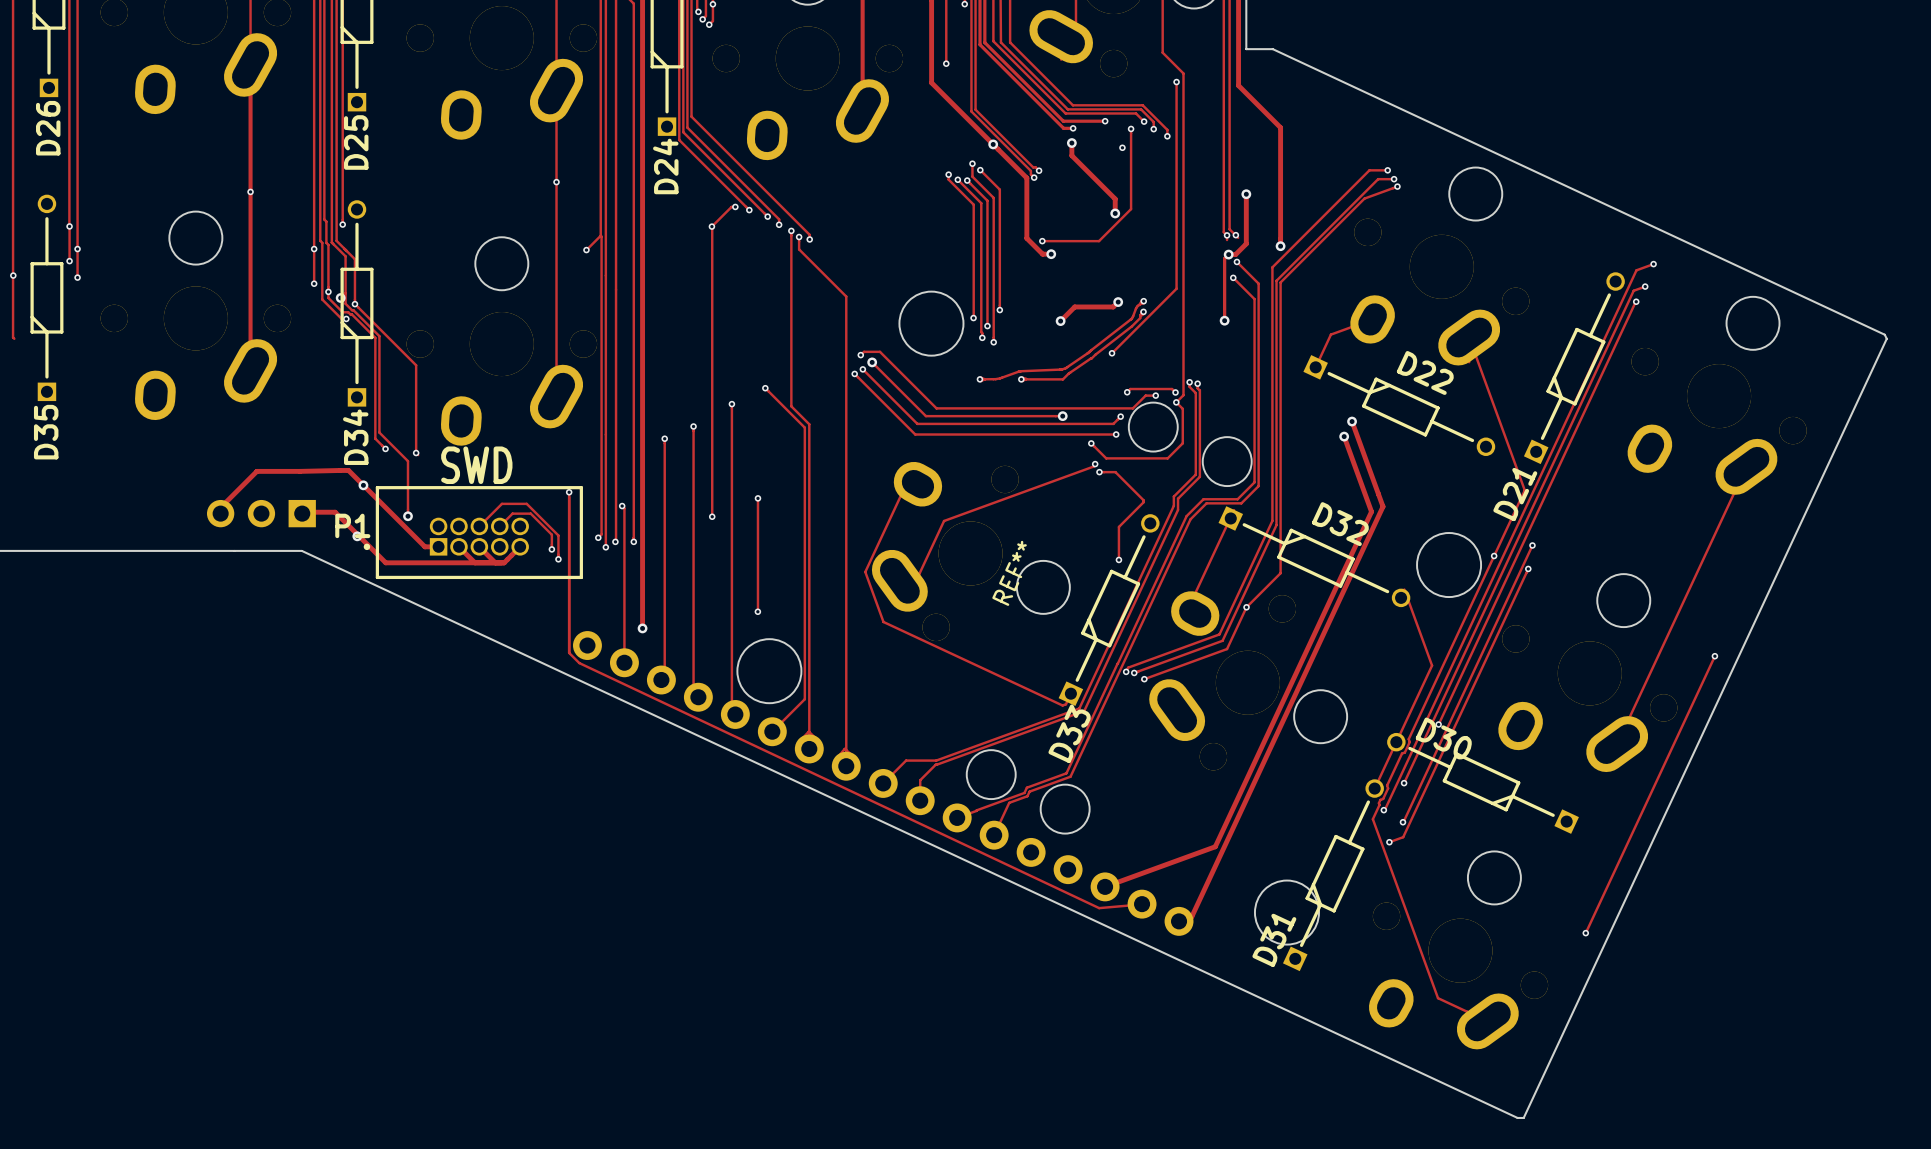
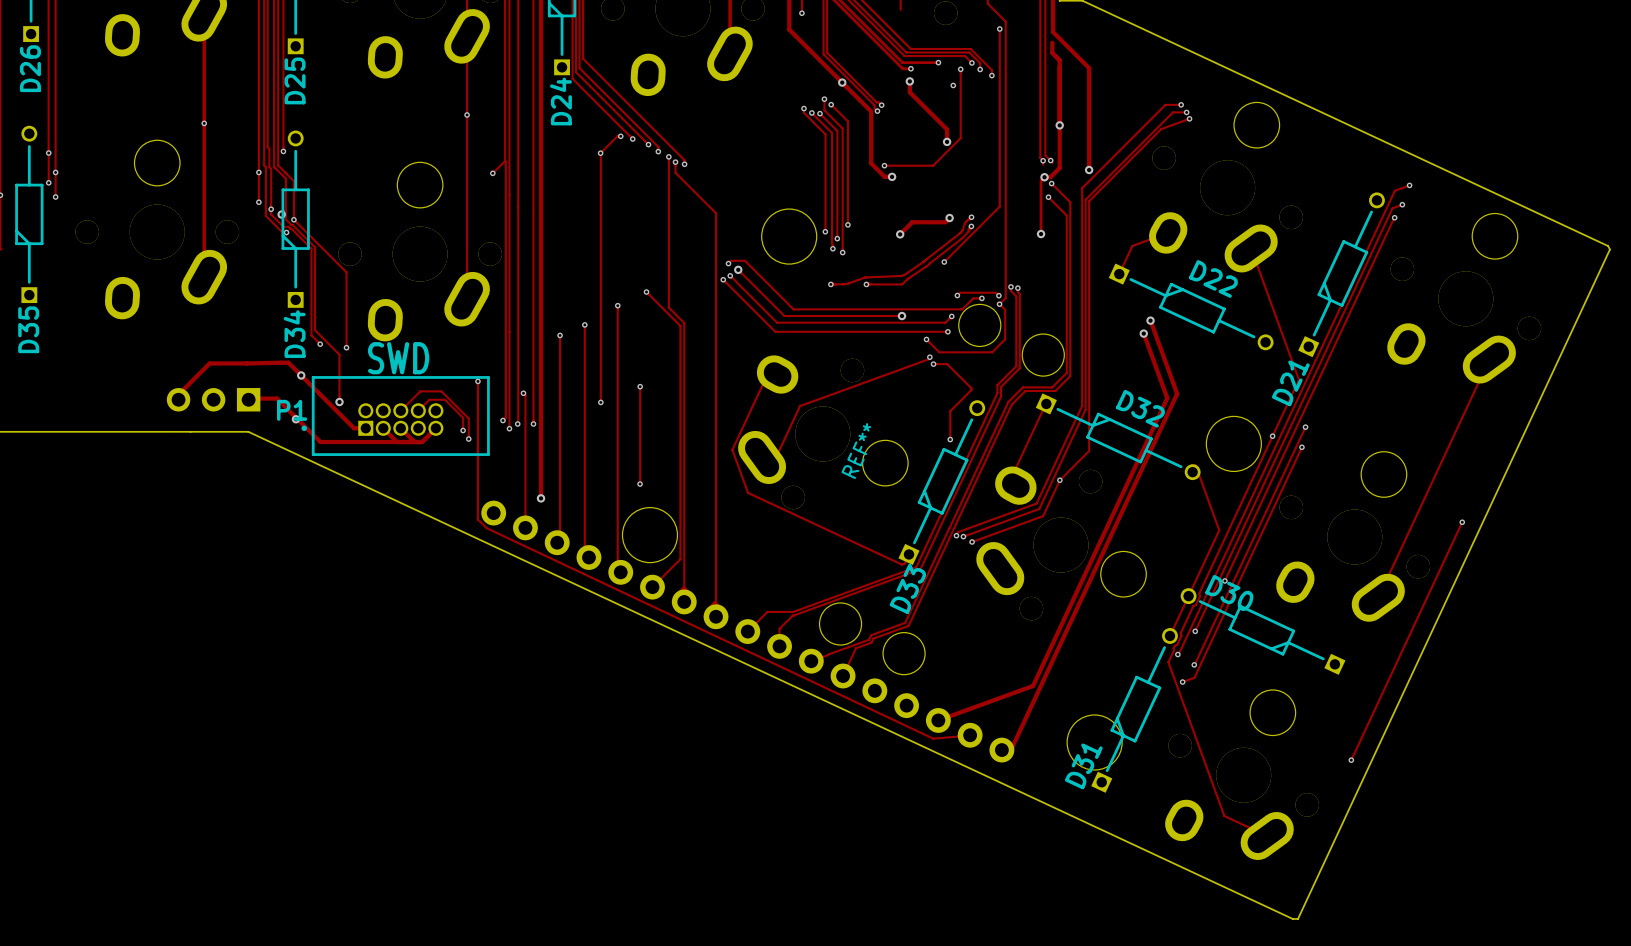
track: none -> (1052, 42) (1052, 53) (1059, 60) (1059, 125)

